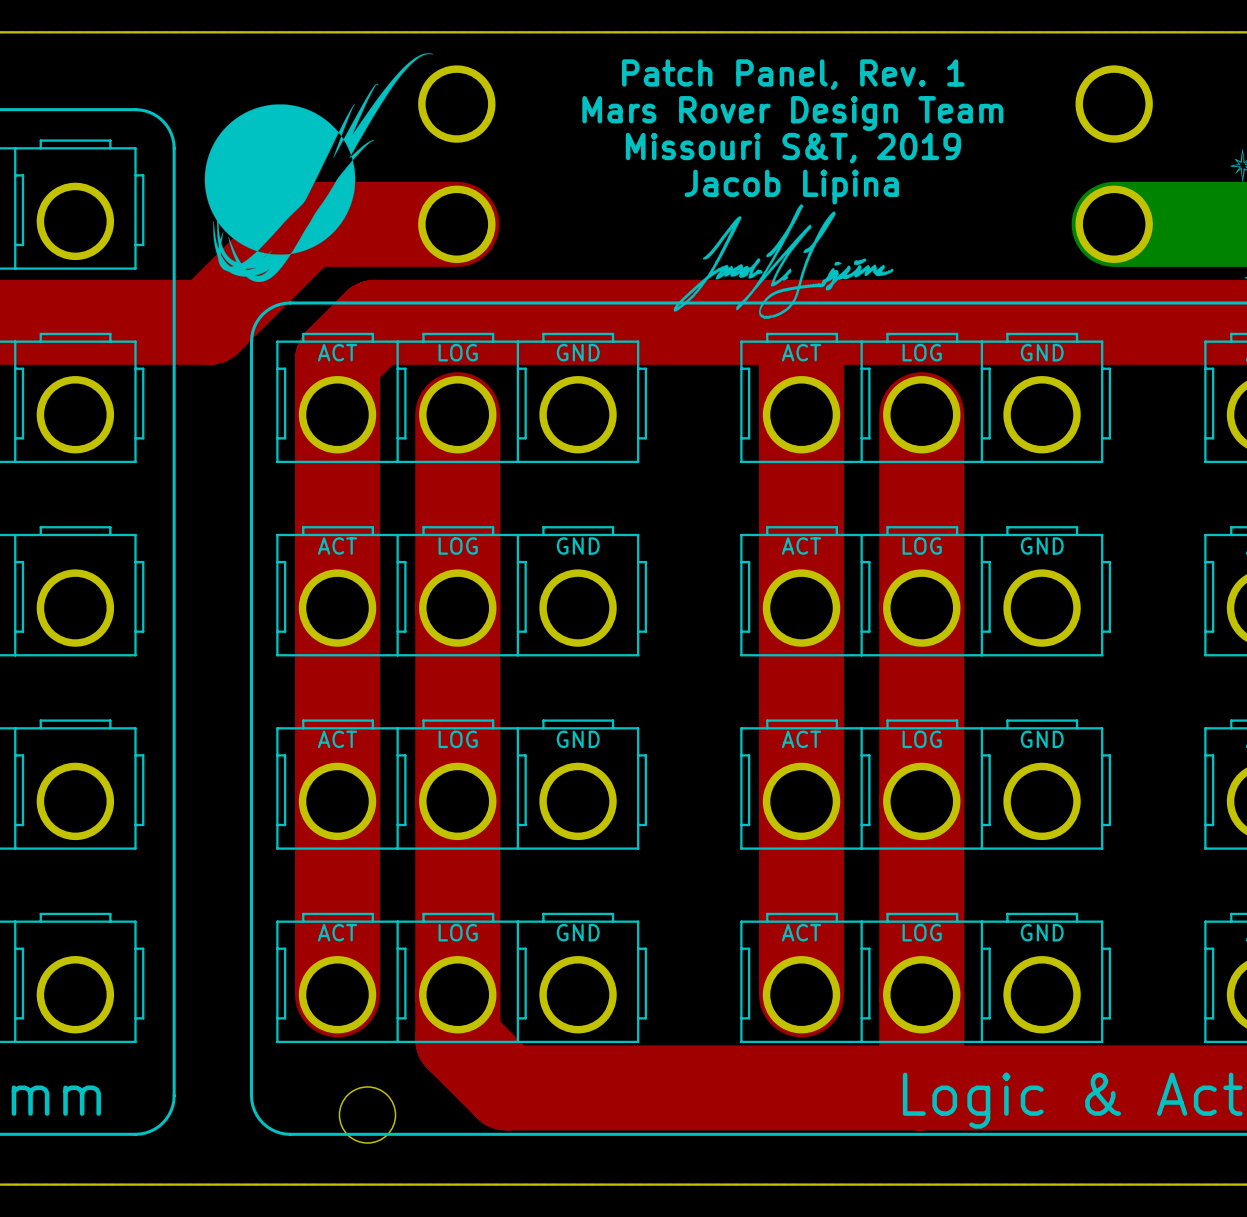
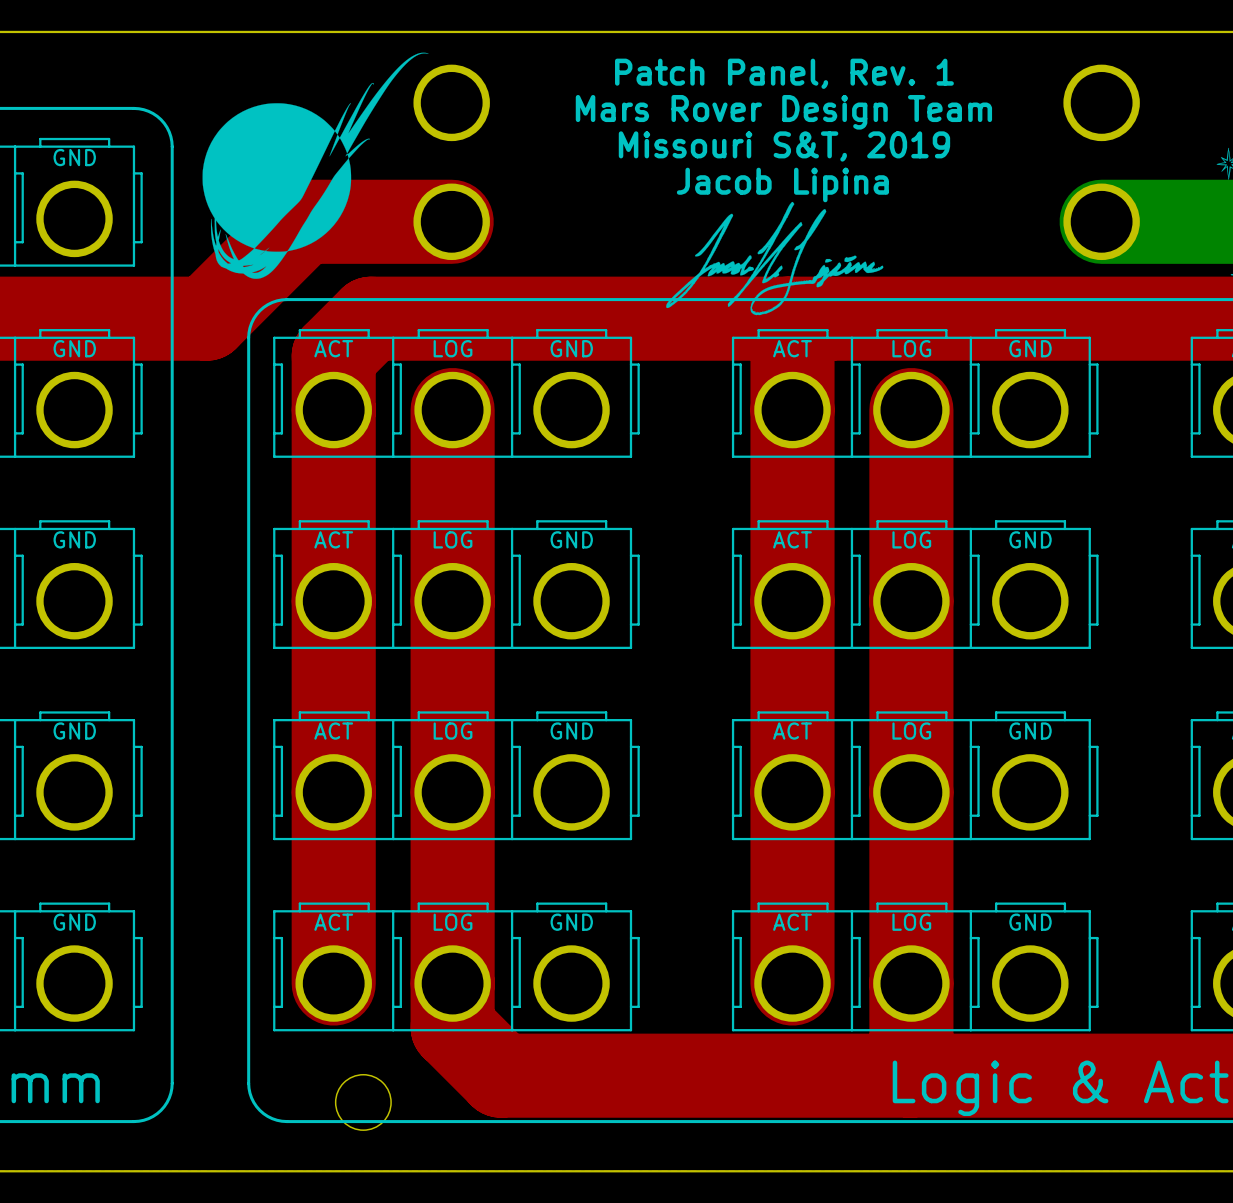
part text: none -> GND (74, 157)
part text: none -> GND (74, 348)
part text: none -> GND (74, 539)
part text: none -> GND (74, 731)
part text: none -> GND (74, 922)

